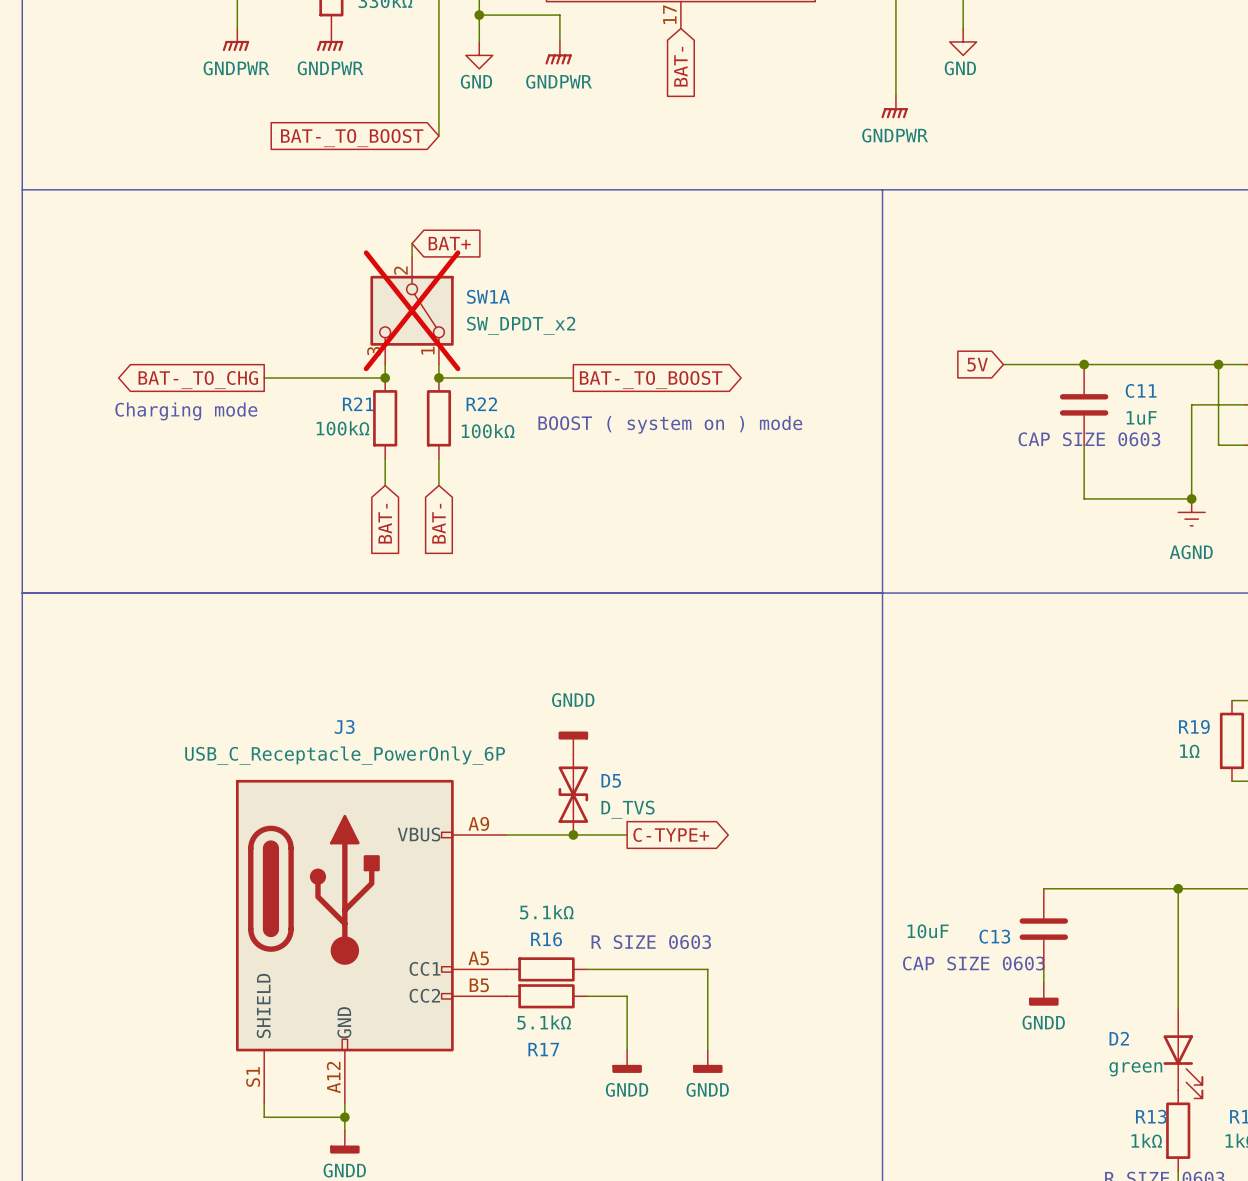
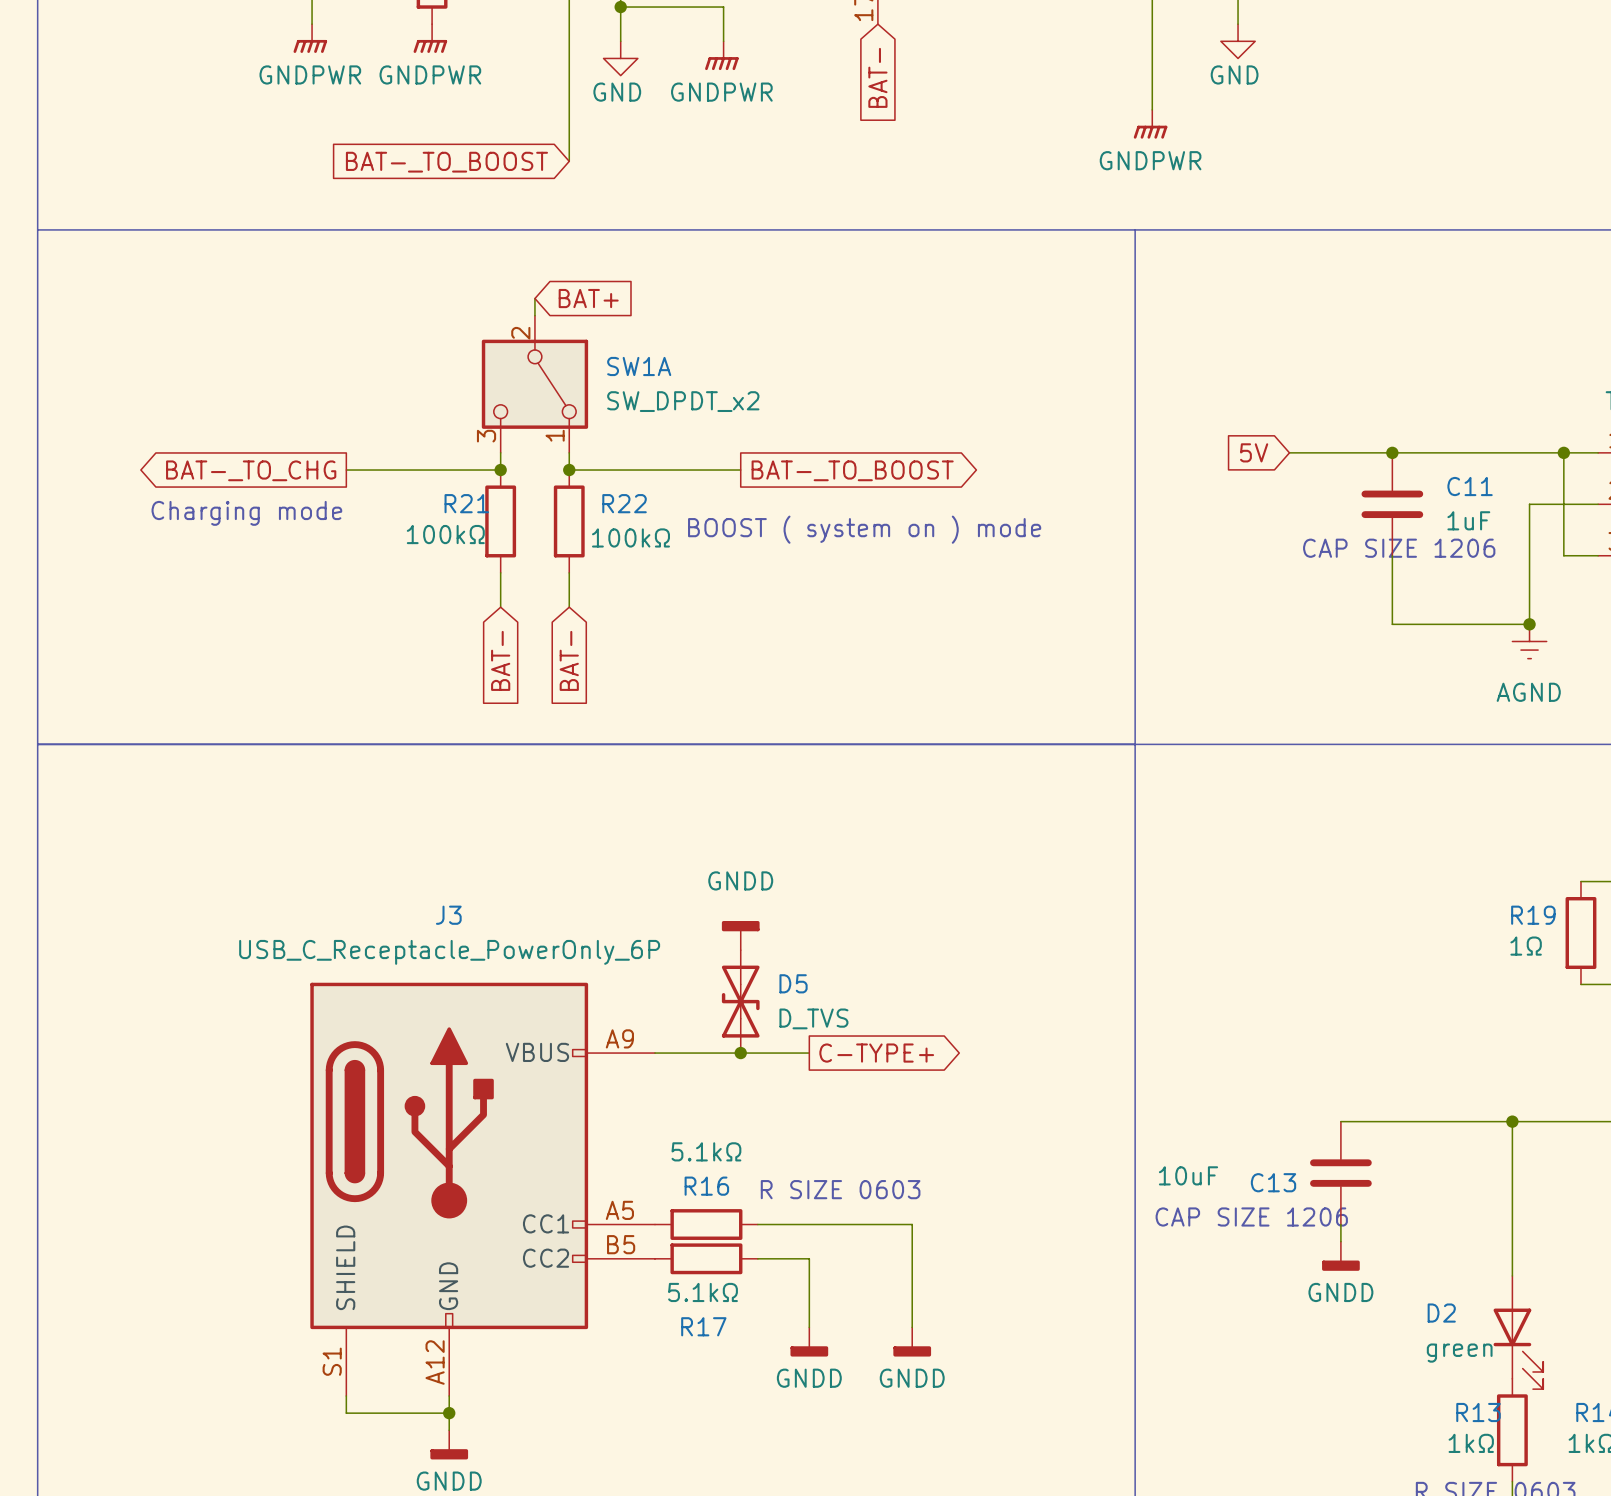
SW1A do-not-place cross: (412, 310) -> none
text: CAP SIZE 0603 (1089, 439) -> CAP SIZE 1206 (1399, 548)
text: CAP SIZE 0603 (973, 963) -> CAP SIZE 1206 (1251, 1216)

